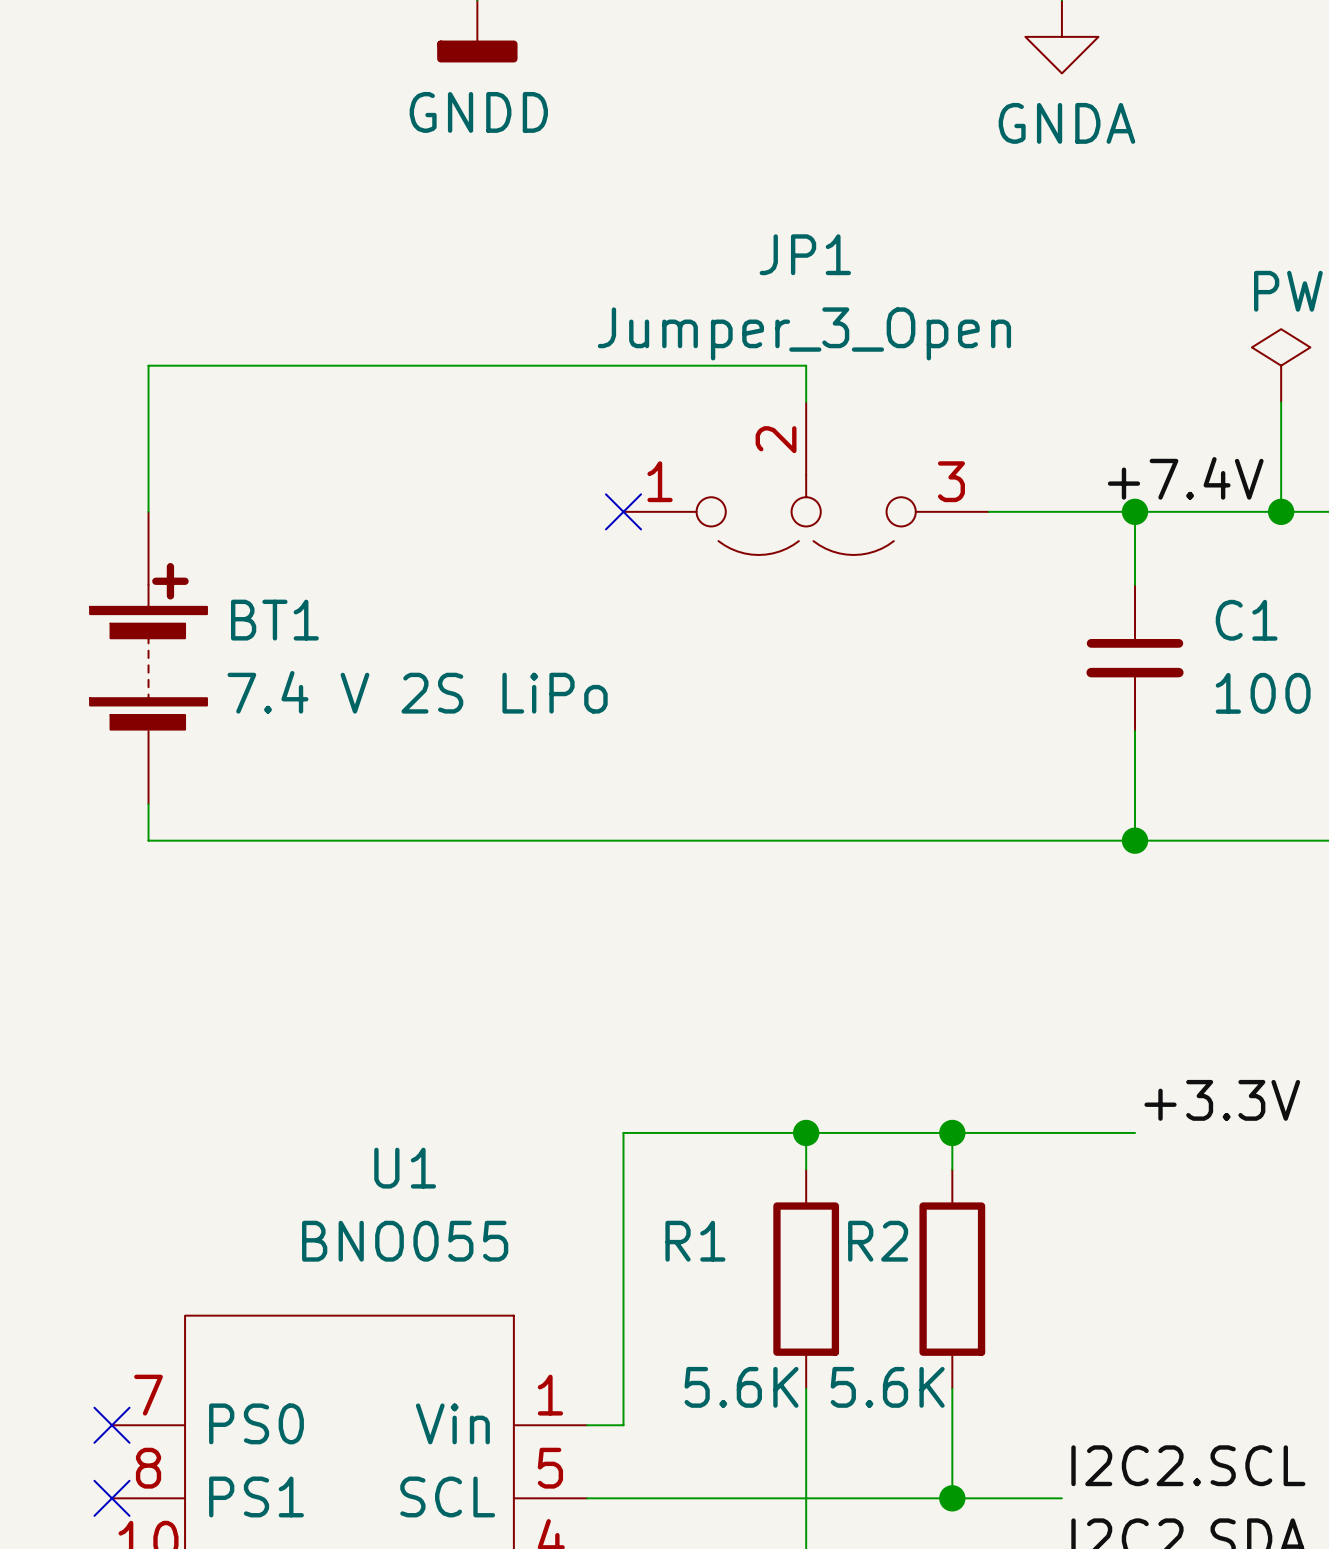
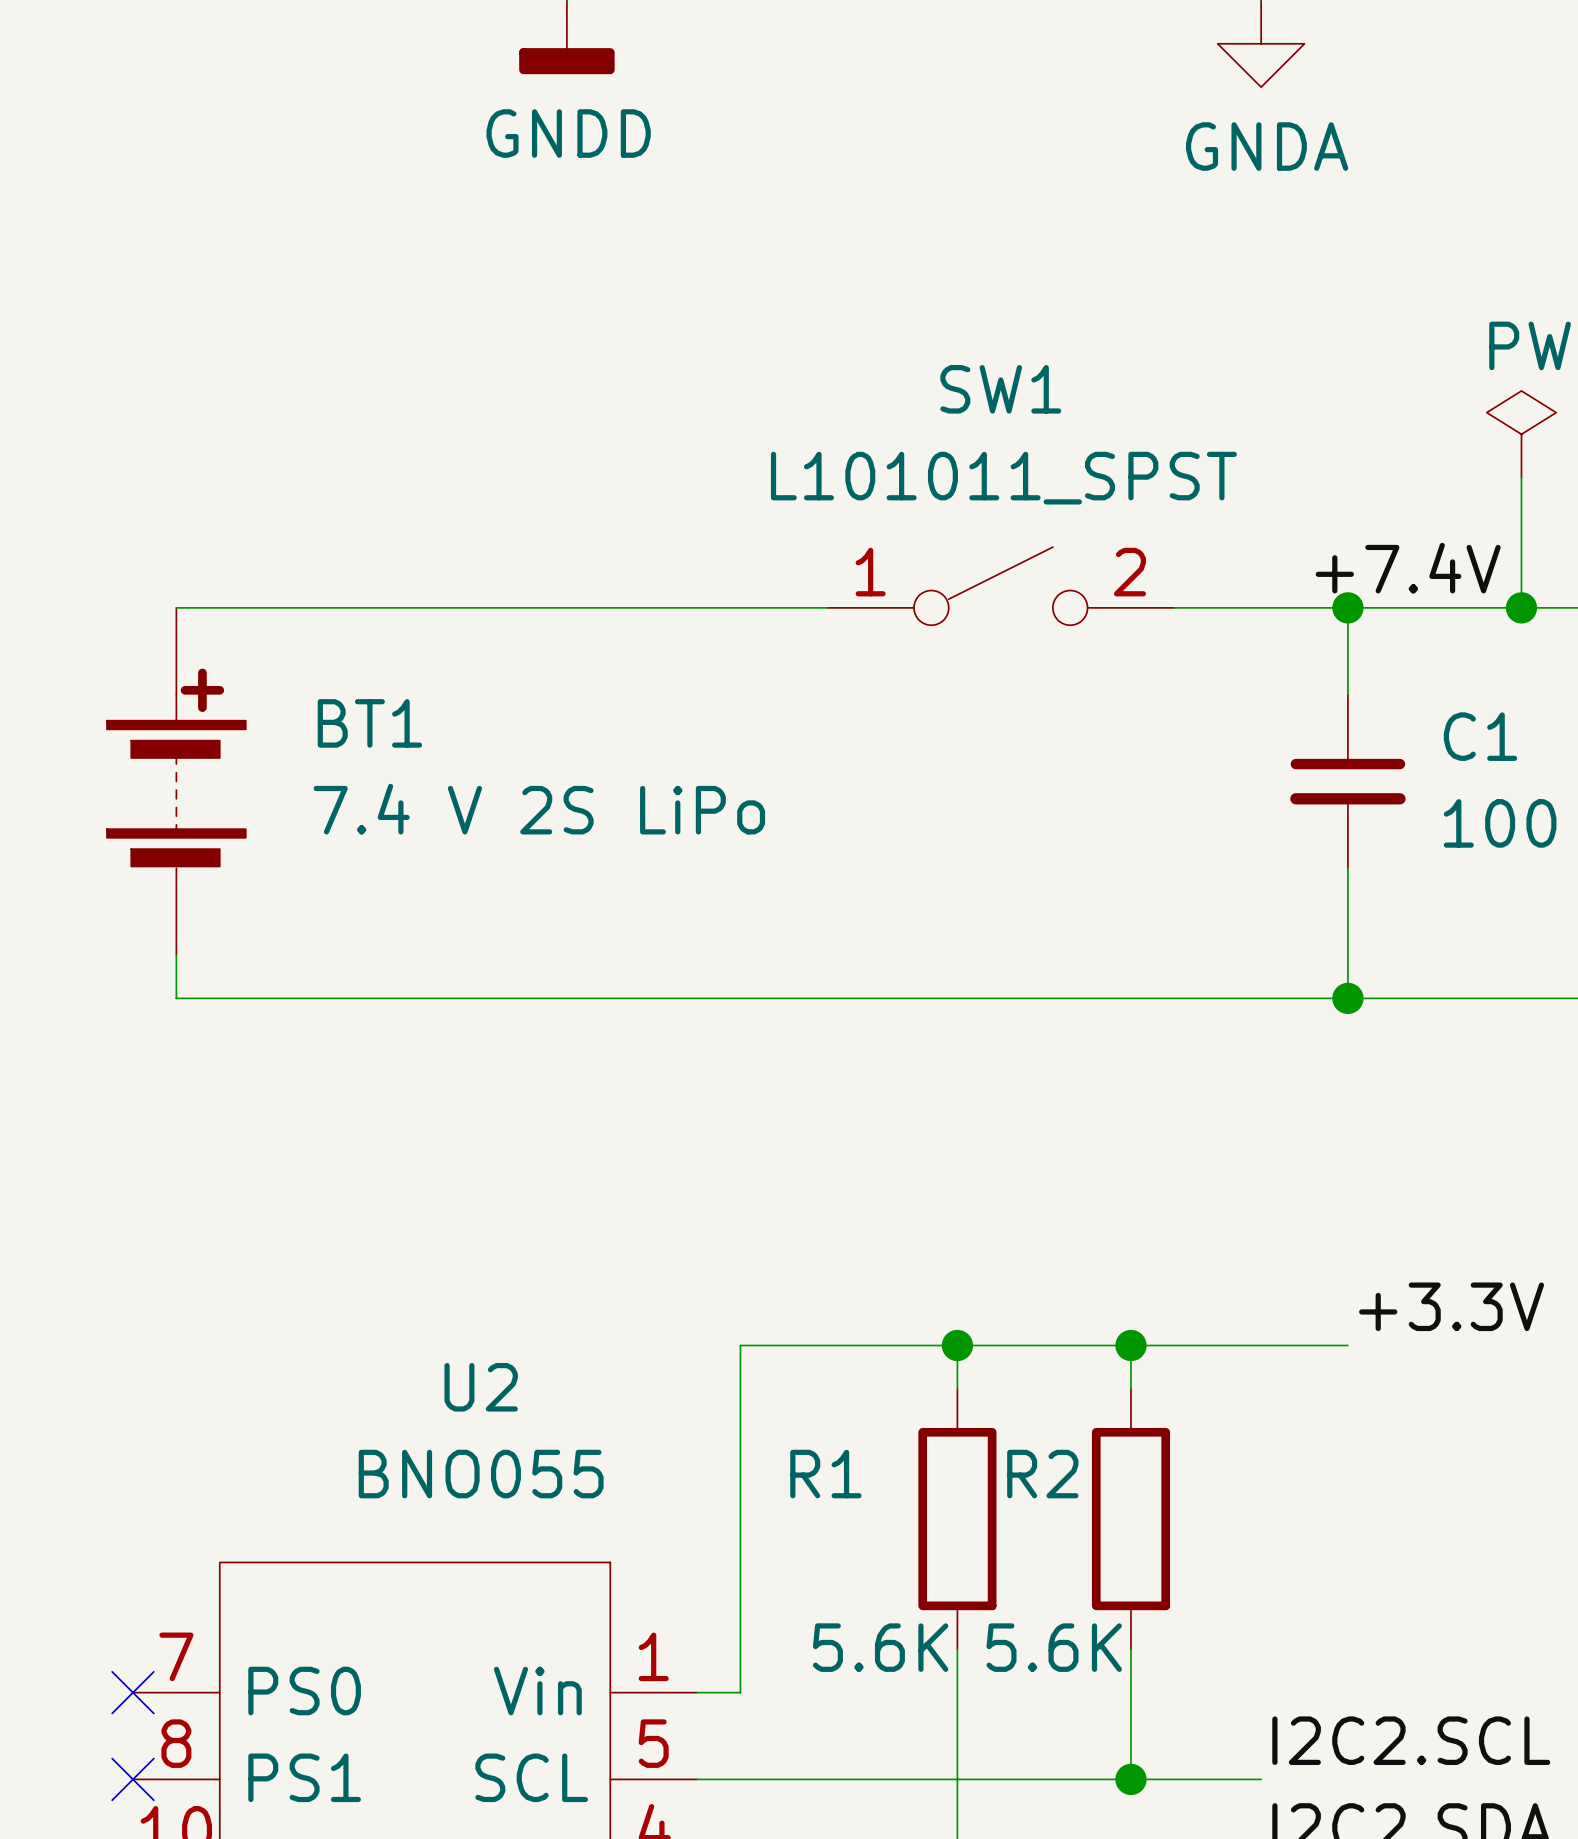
wire: (806, 402) (806, 365) (148, 365) (148, 511) -> (827, 607) (176, 607)
JP1: Jumper_3_Open (806, 478) -> none
SW1: none -> L101011_SPST (1000, 586)
no-connect mark: (623, 511) -> none
BT1 name position: BT1 (274, 620) -> BT1 (369, 723)
BT1 value position: 7.4 V 2S LiPo (417, 692) -> 7.4 V 2S LiPo (539, 809)
U1 name: U1 (405, 1168) -> U2 (481, 1387)

